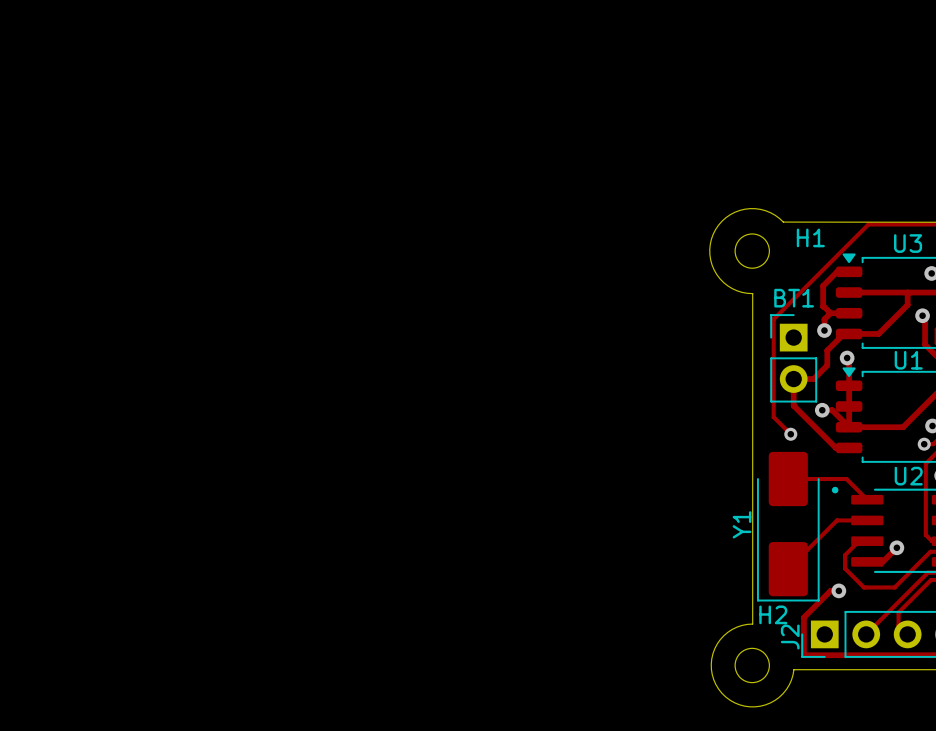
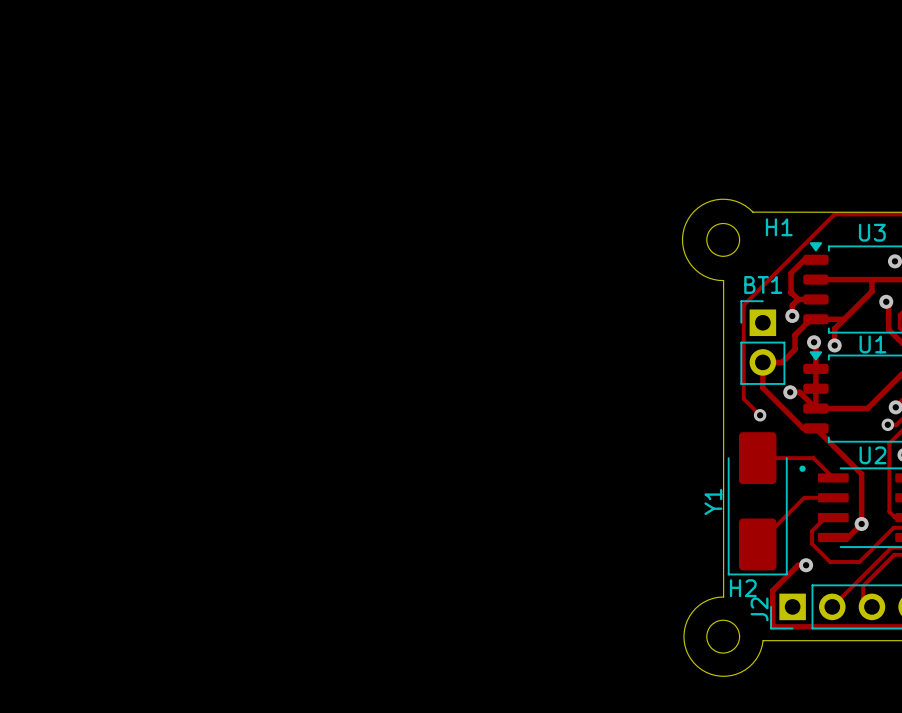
track: none -> (844, 319) (834, 328) (834, 345)
via: none -> (834, 345)
track: none -> (815, 428) (861, 474) (861, 523)

